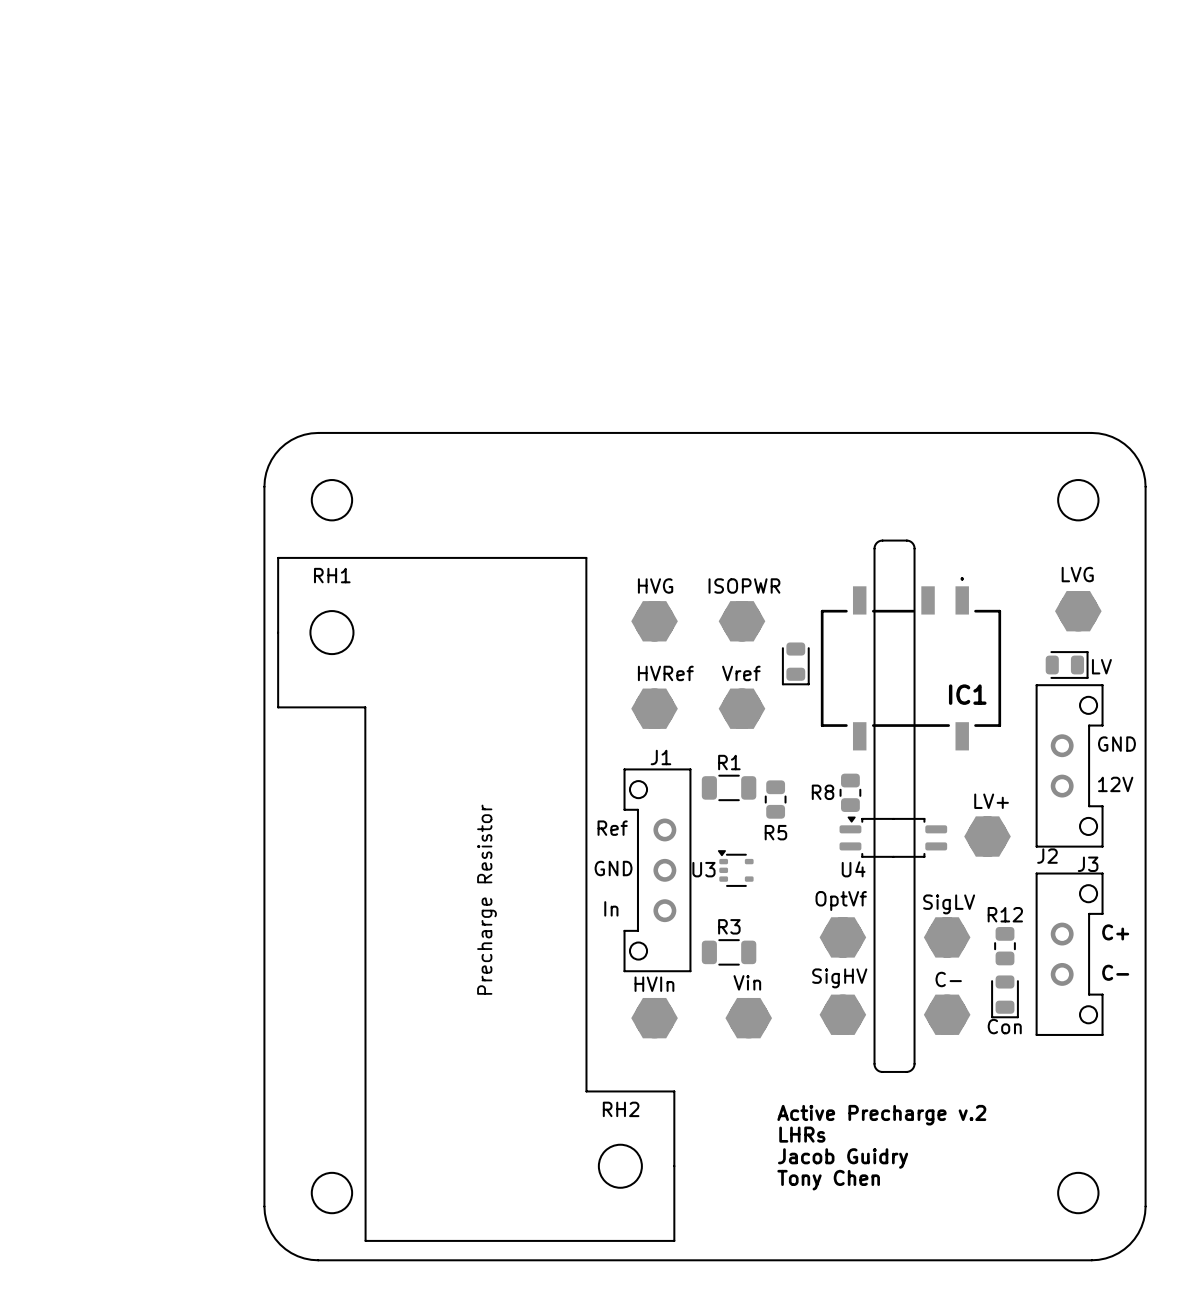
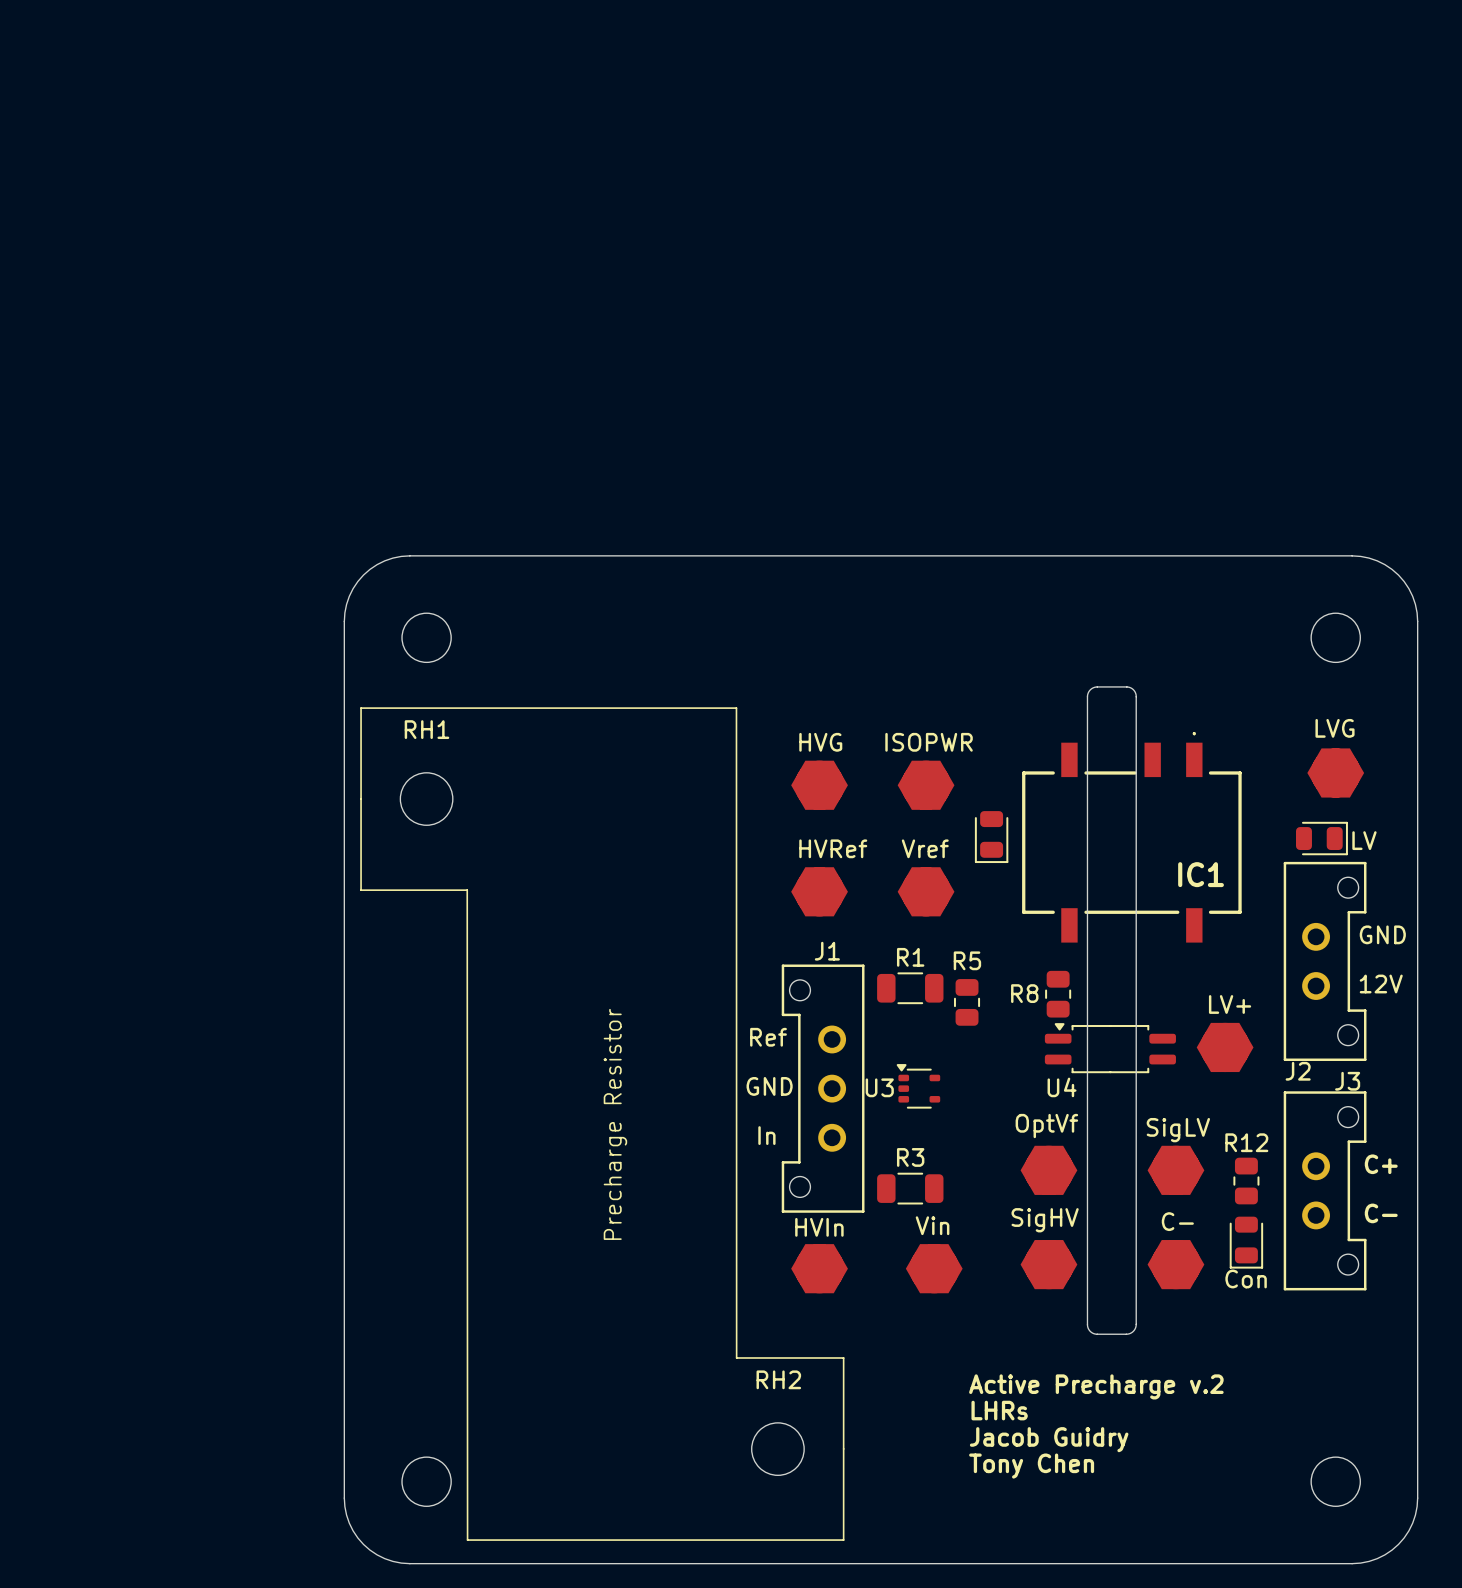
R5 name position: R5 (775, 832) -> R5 (967, 960)

